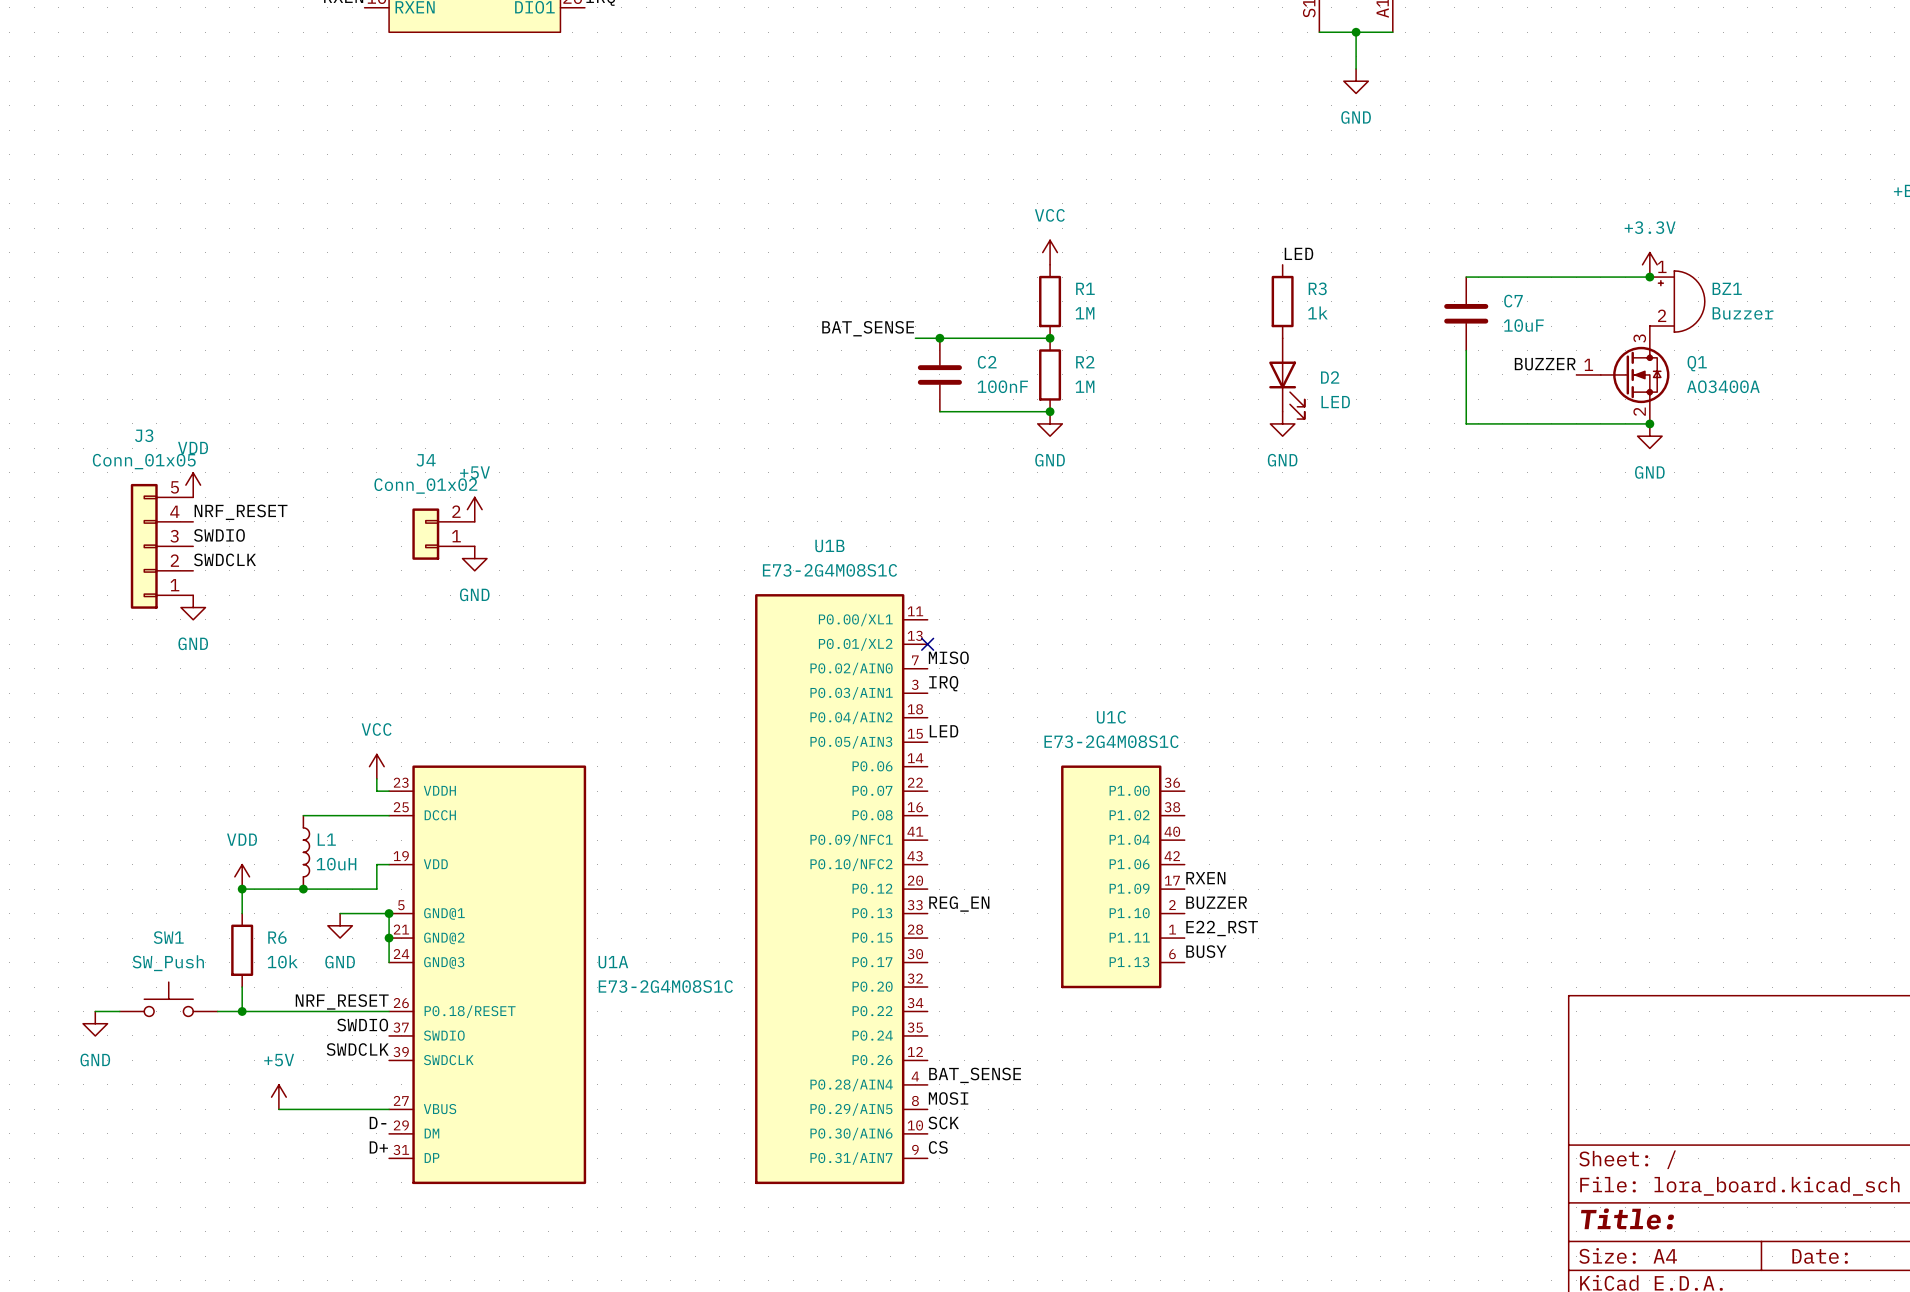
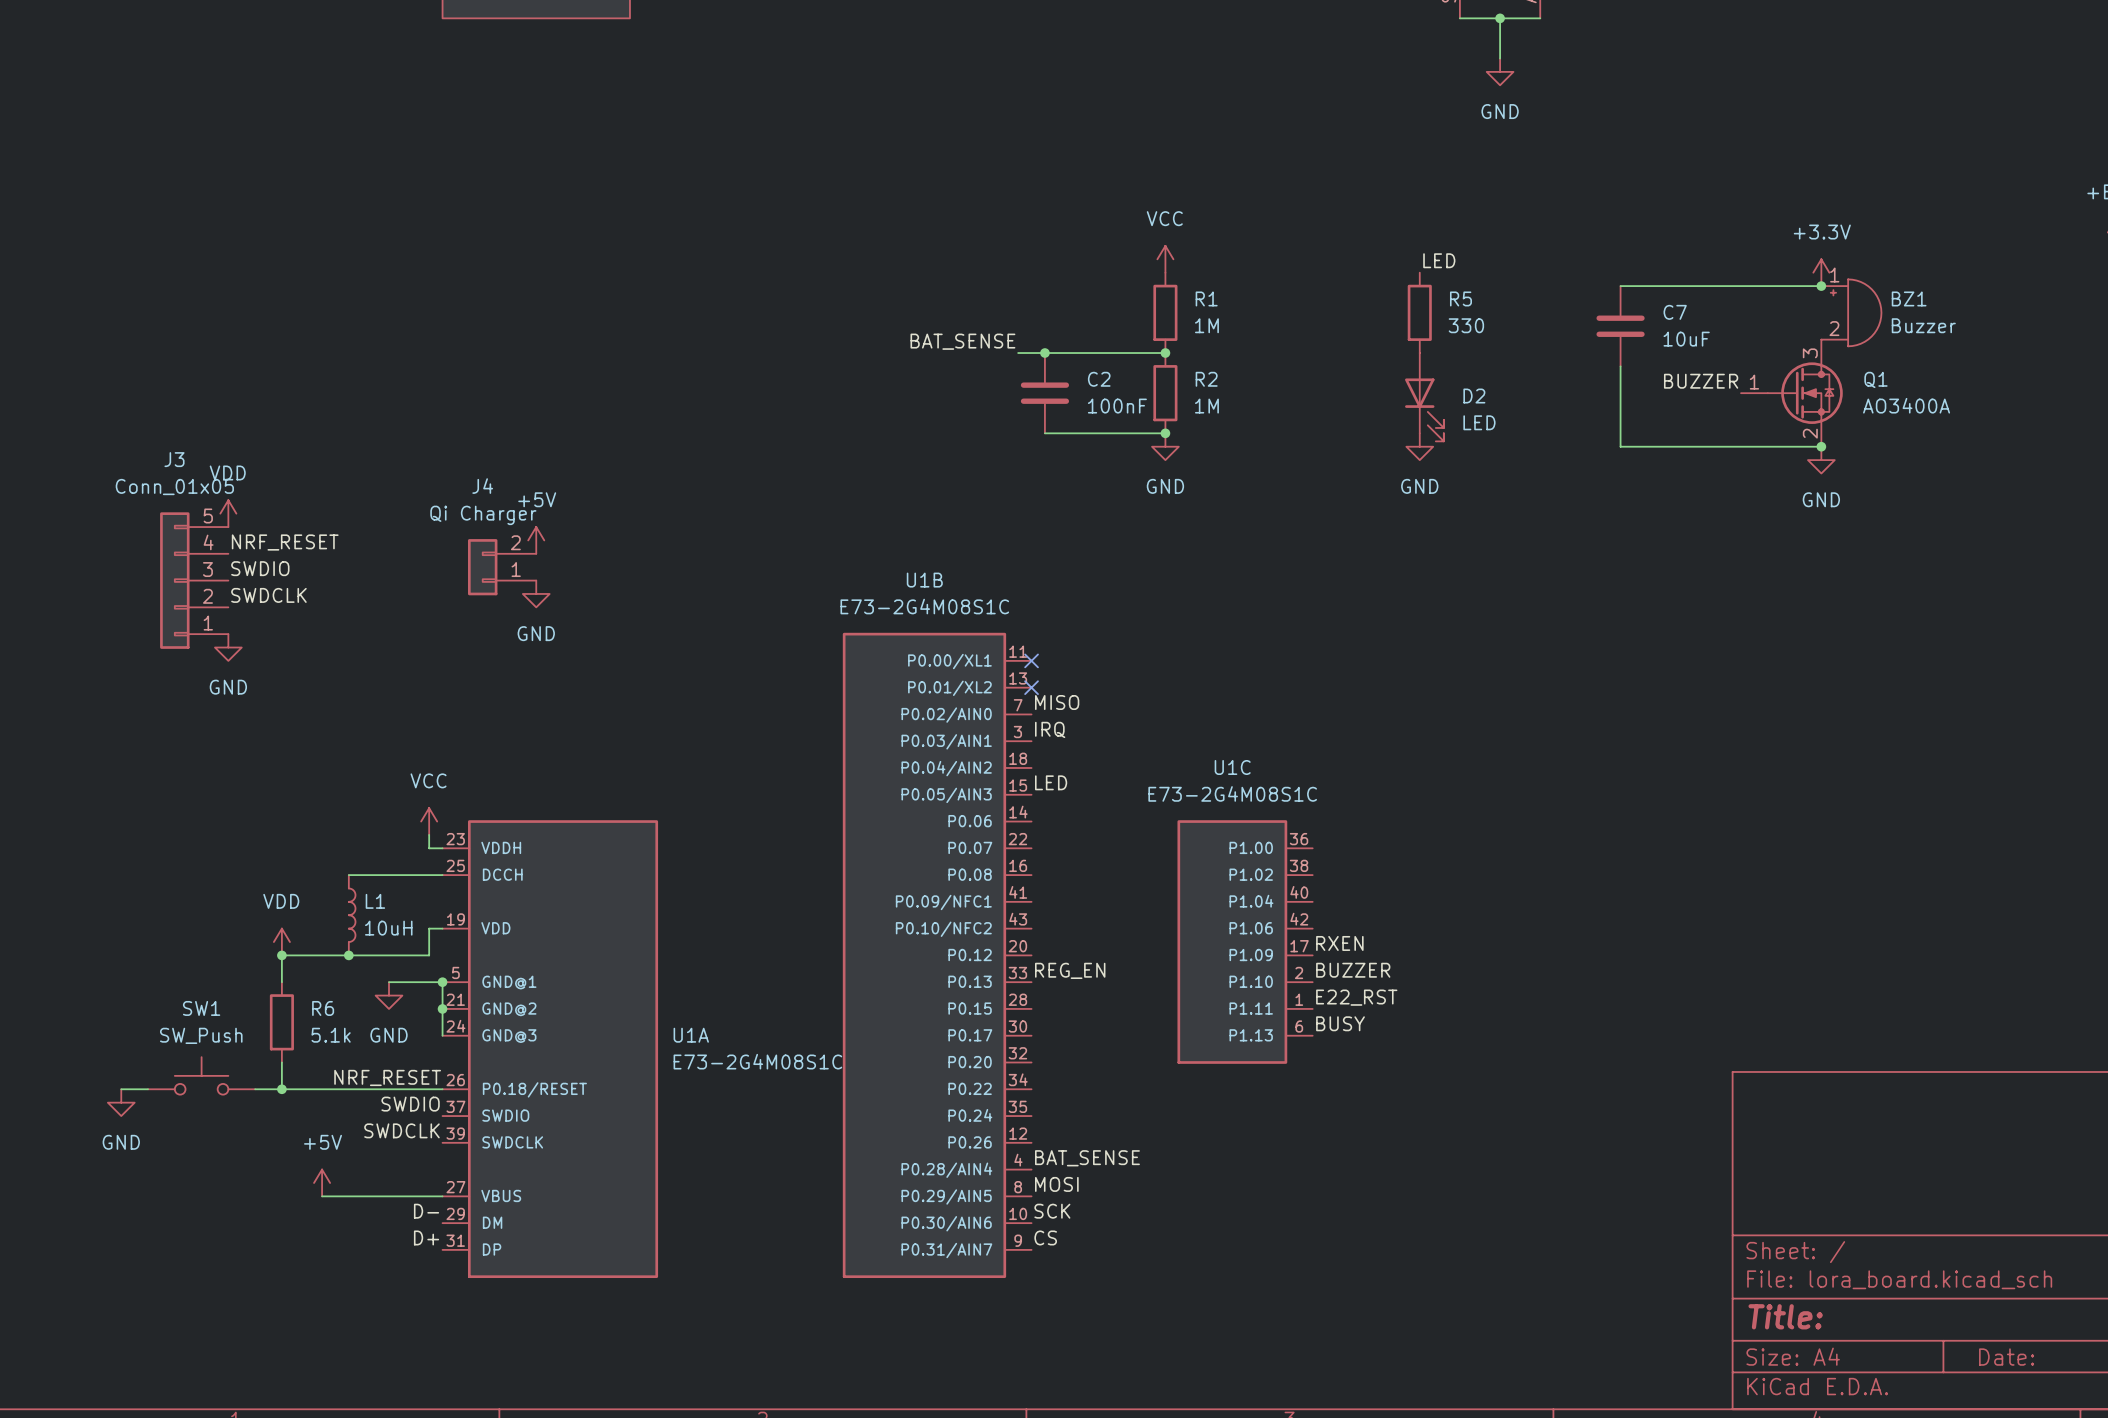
R3 name: R3 (1317, 288) -> R5 (1460, 298)
R3 value: 1k (1317, 312) -> 330 (1466, 325)
J4 value: Conn_01x02 (425, 486) -> Qi Charger (483, 515)
no-connect mark: none -> (1031, 660)
R6 value: 10k (282, 961) -> 5.1k (331, 1035)

